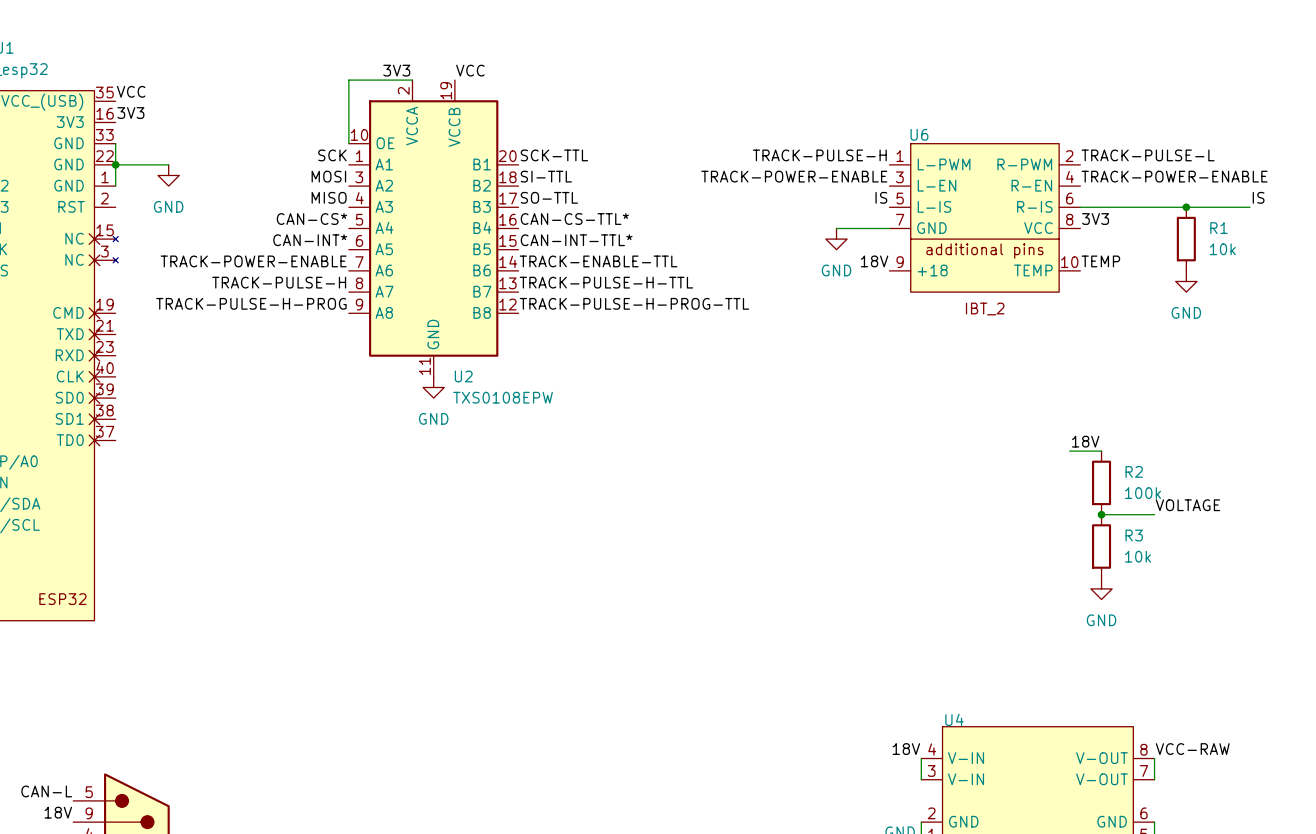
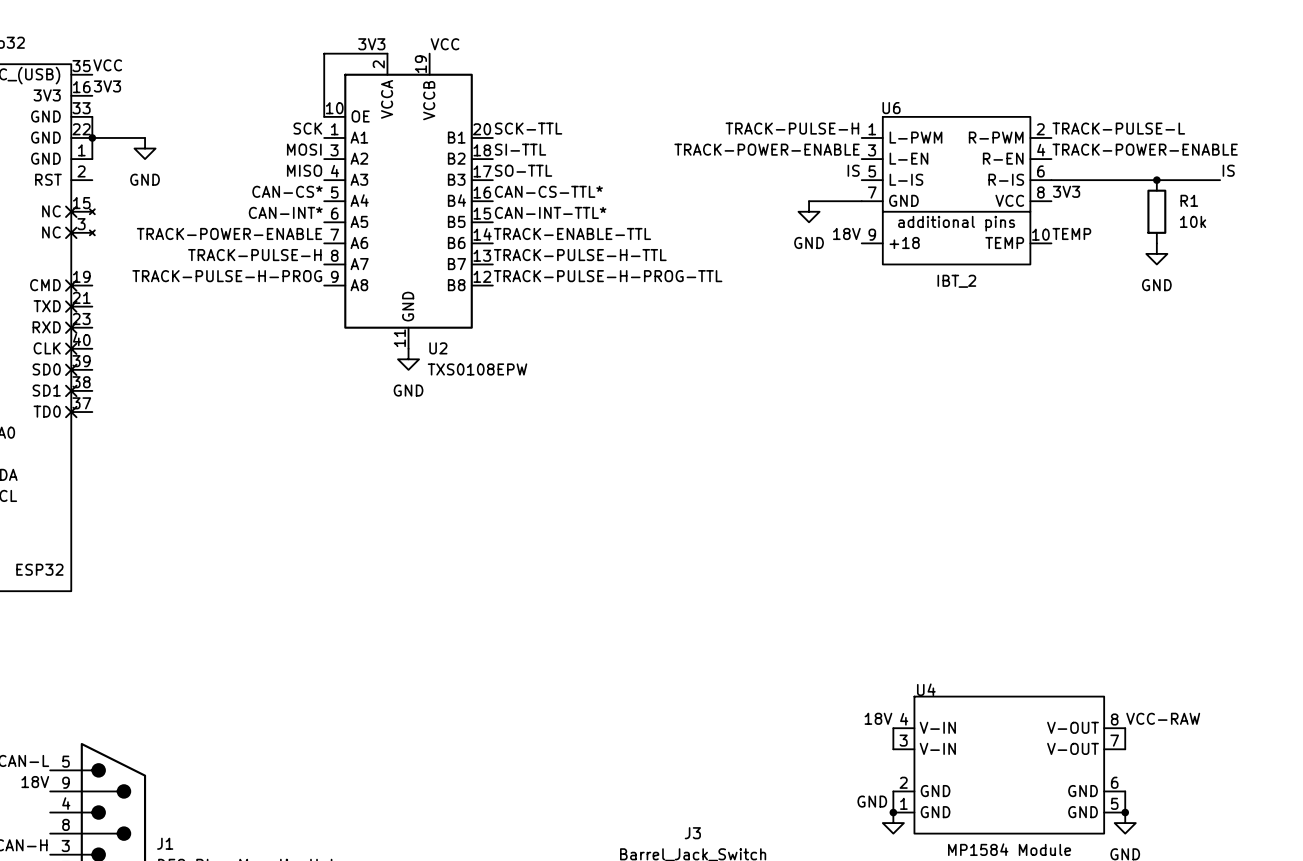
label: 18V (1085, 441) -> none
wire: (1069, 451) (1101, 451) -> none
R2: 100k (1101, 482) -> none
label: VOLTAGE (1187, 505) -> none
wire: (1101, 514) (1154, 514) -> none
junction: (1101, 514) -> none
R3: 10k (1101, 546) -> none
power symbol: GND (1101, 588) -> none

